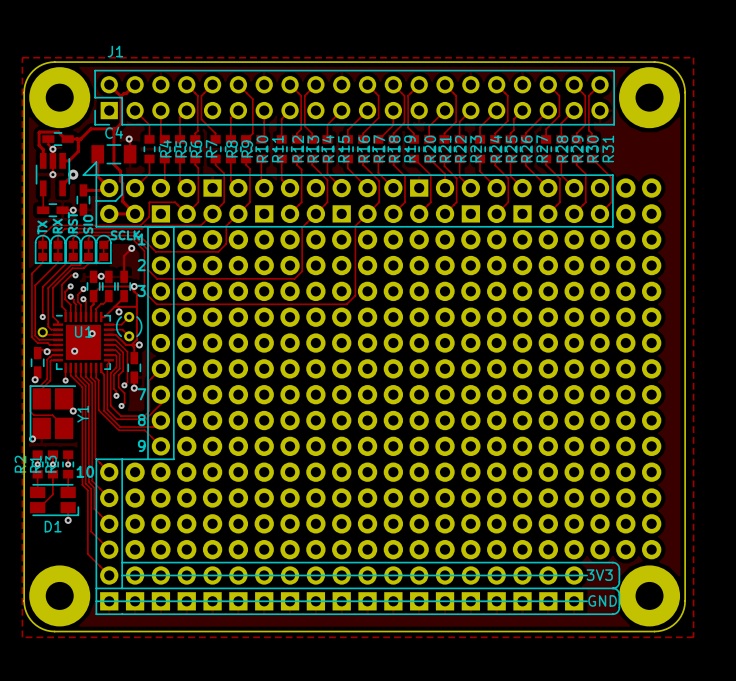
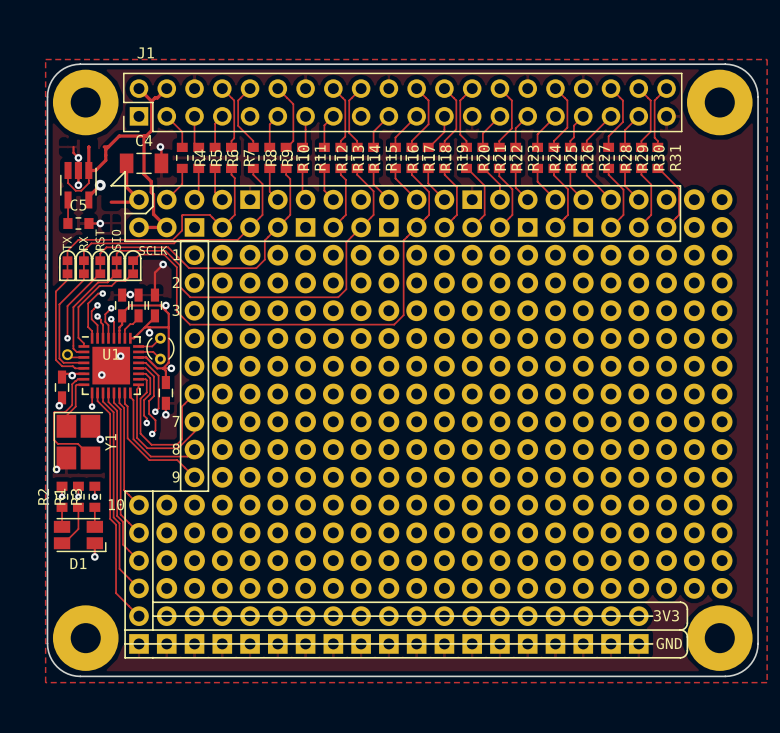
part: (58, 139) -> none
track: (76, 139) (65, 139) (58, 132) (39, 132) (39, 145) (43, 149) (43, 160) -> (88, 147) (88, 183) (81, 190) (75, 190) (68, 183) (68, 170)
part: (83, 200) -> none
part: (52, 210) -> none
C5: none -> (78, 223)

